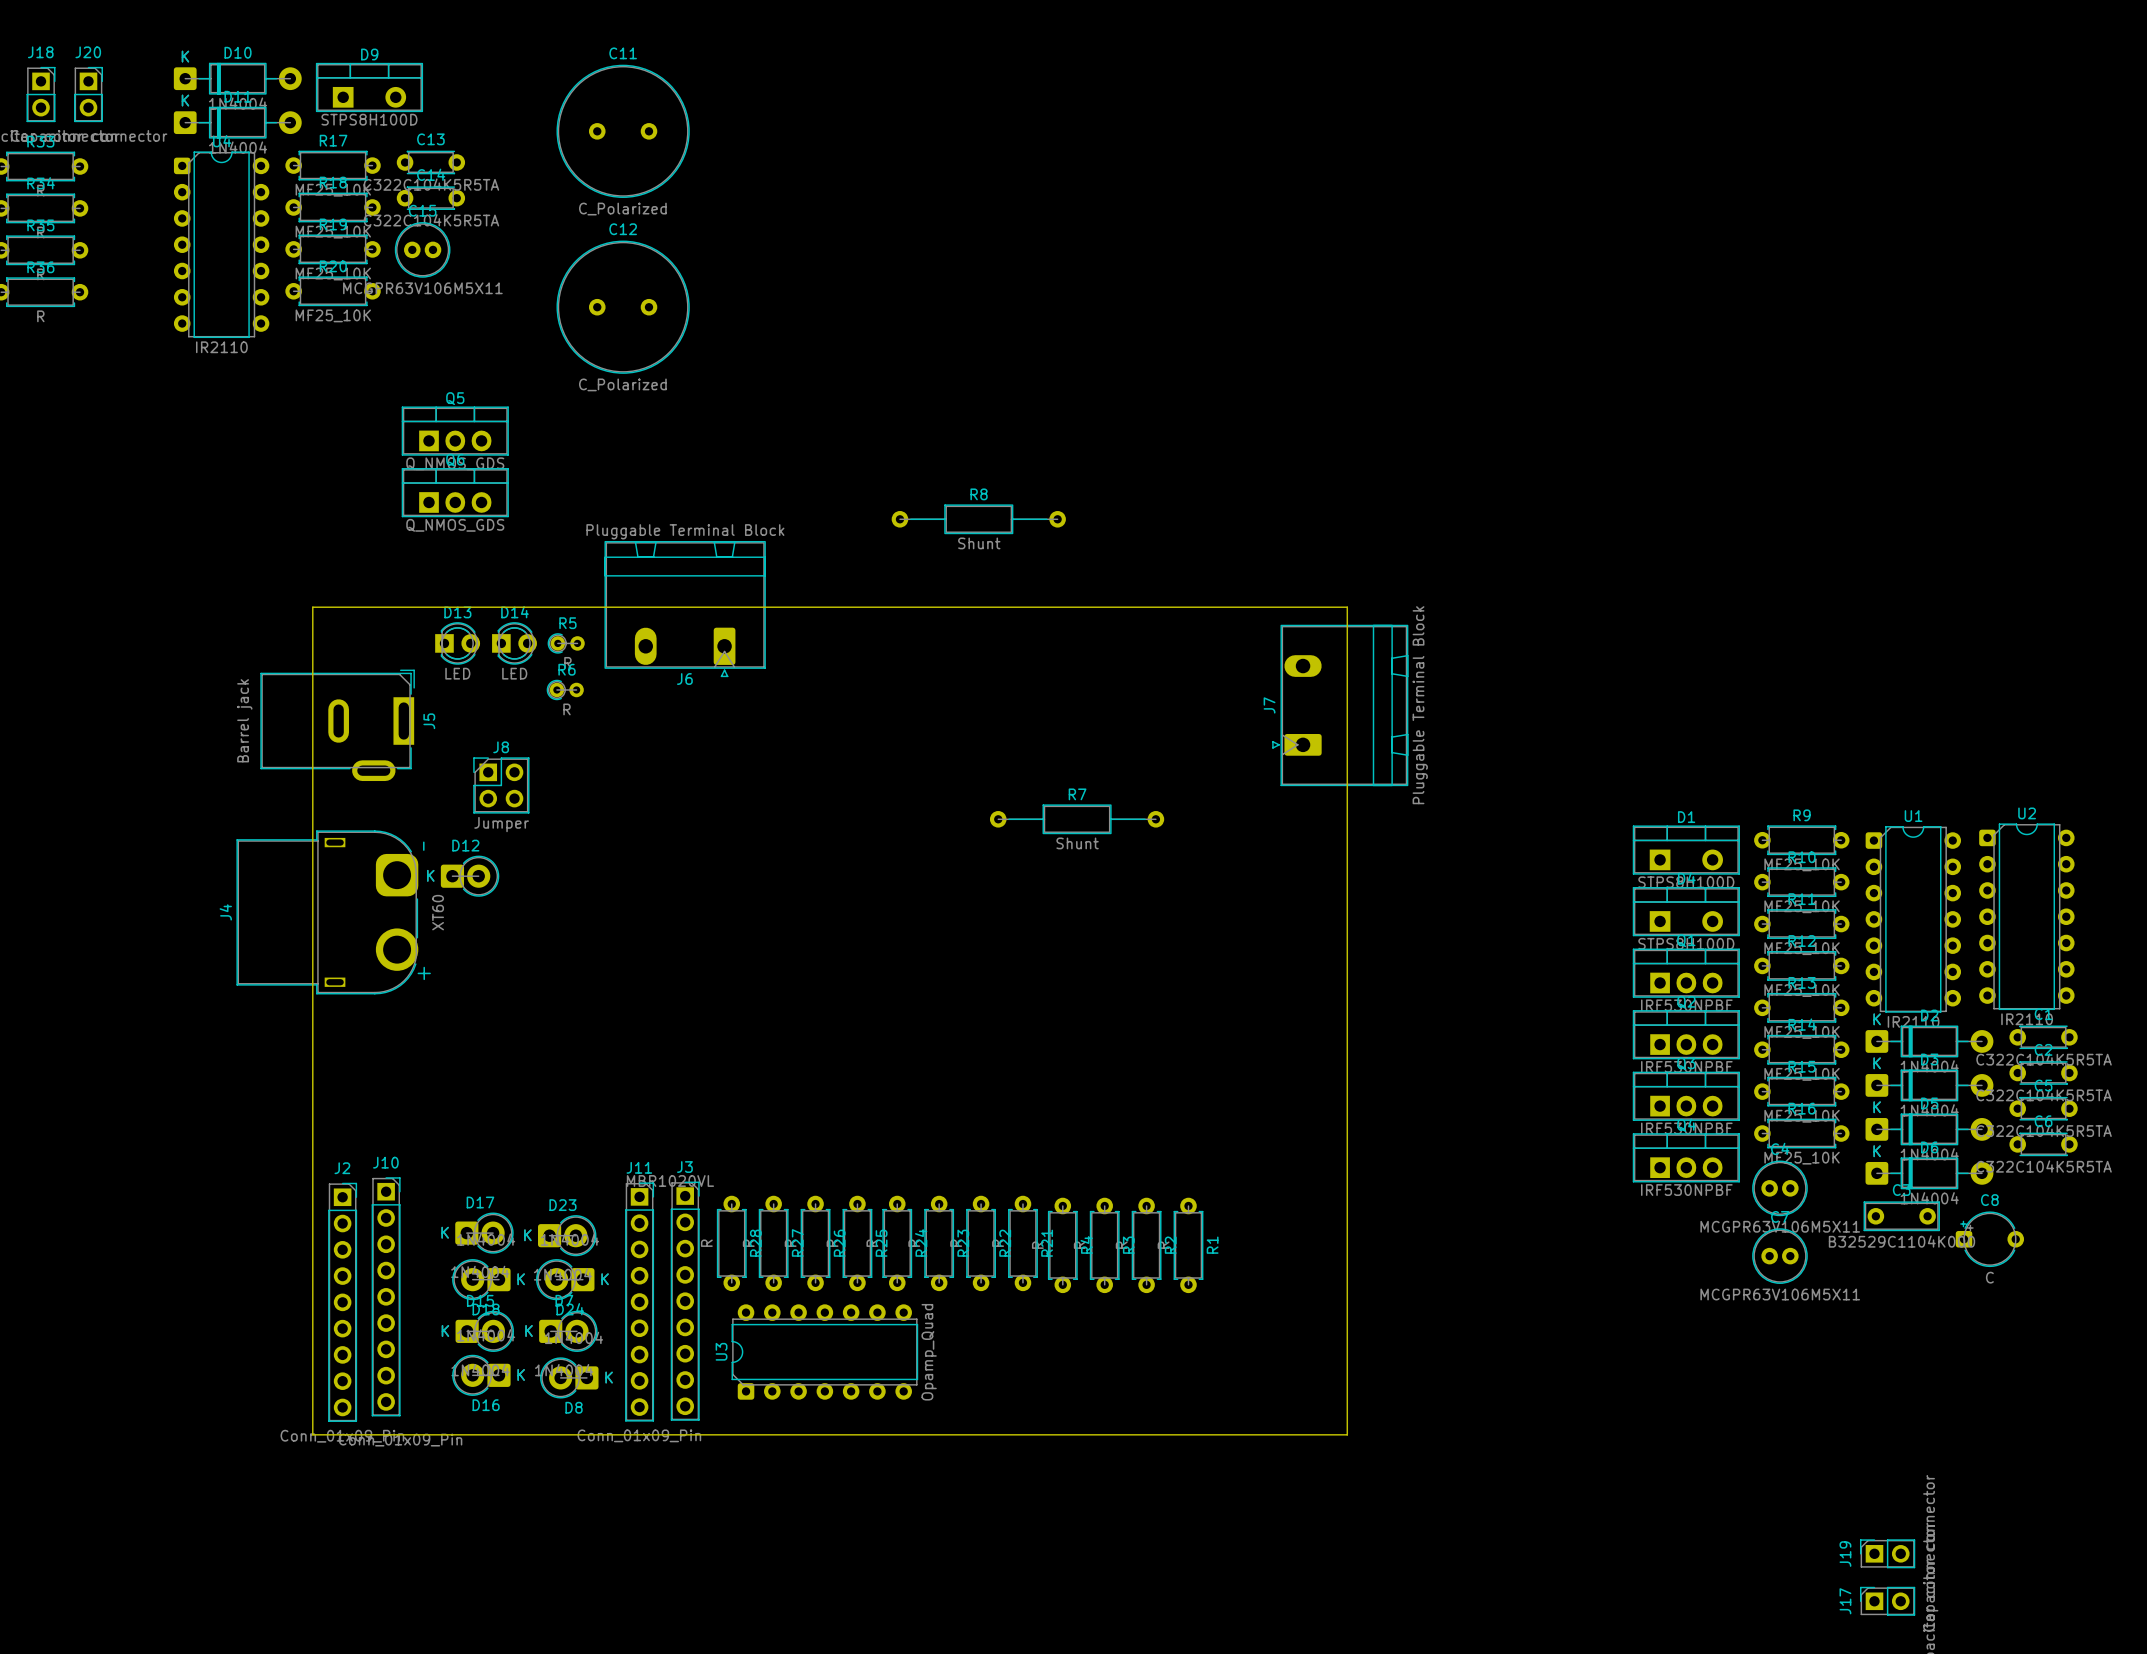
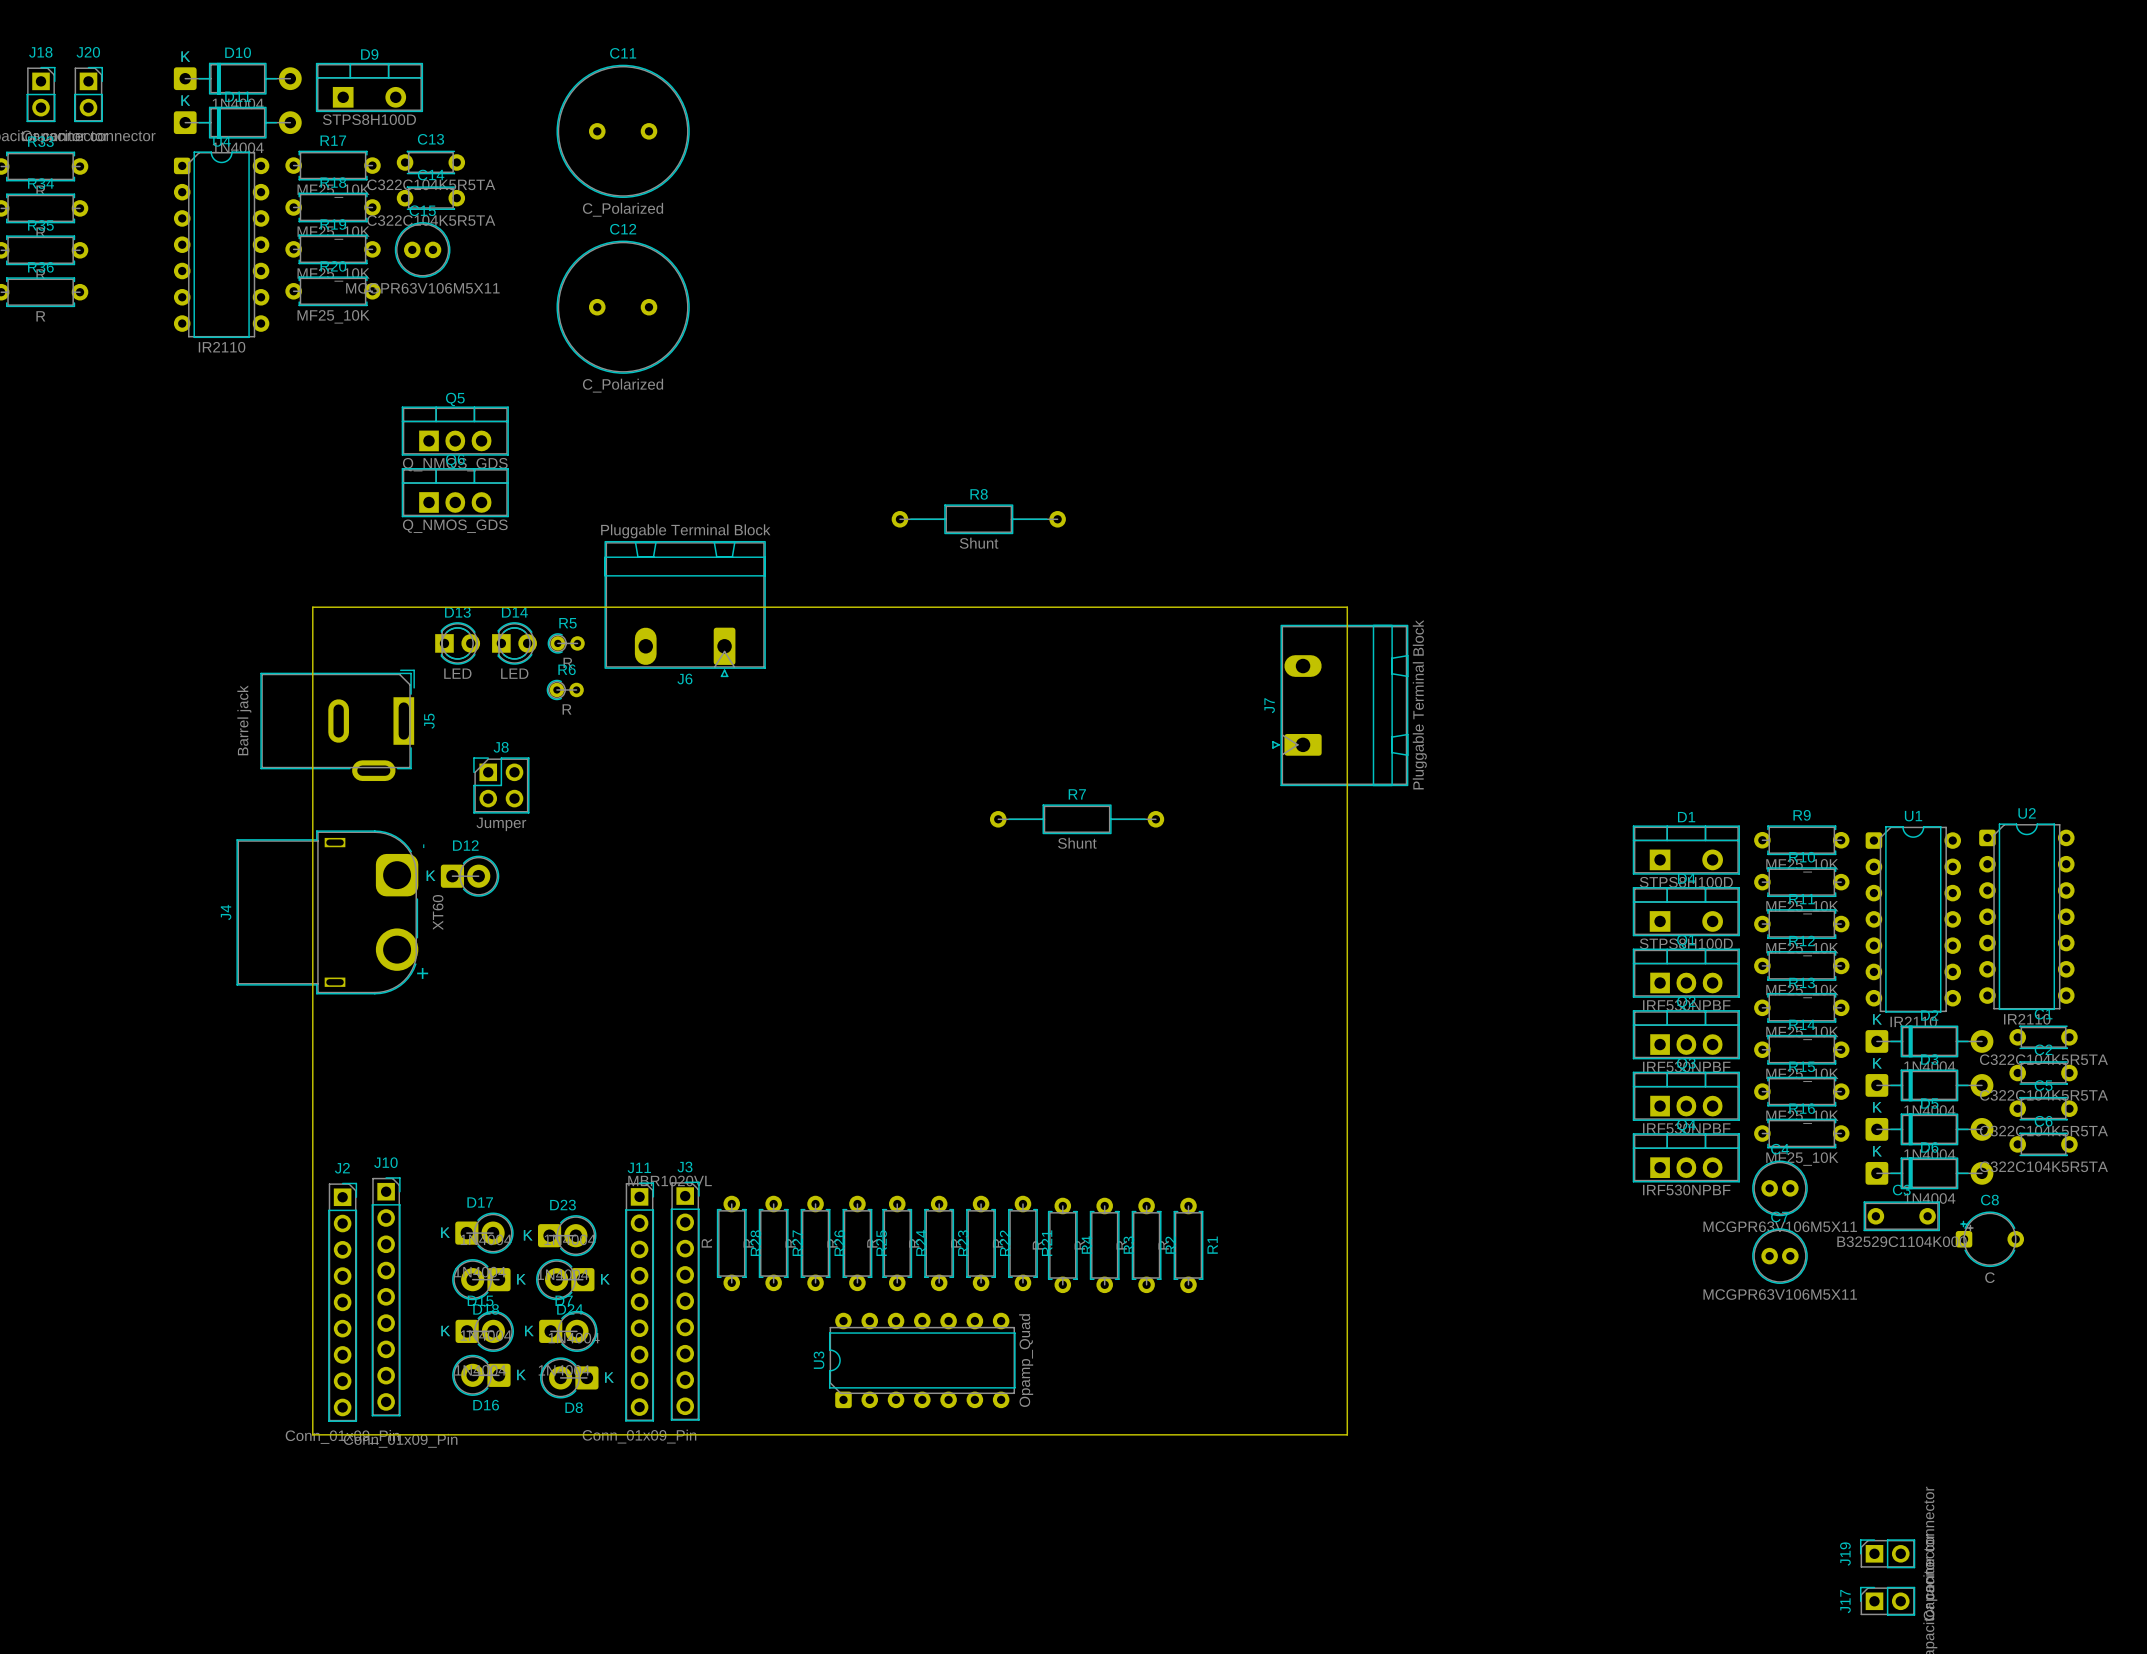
U3 position: (824, 1352) -> (922, 1360)

